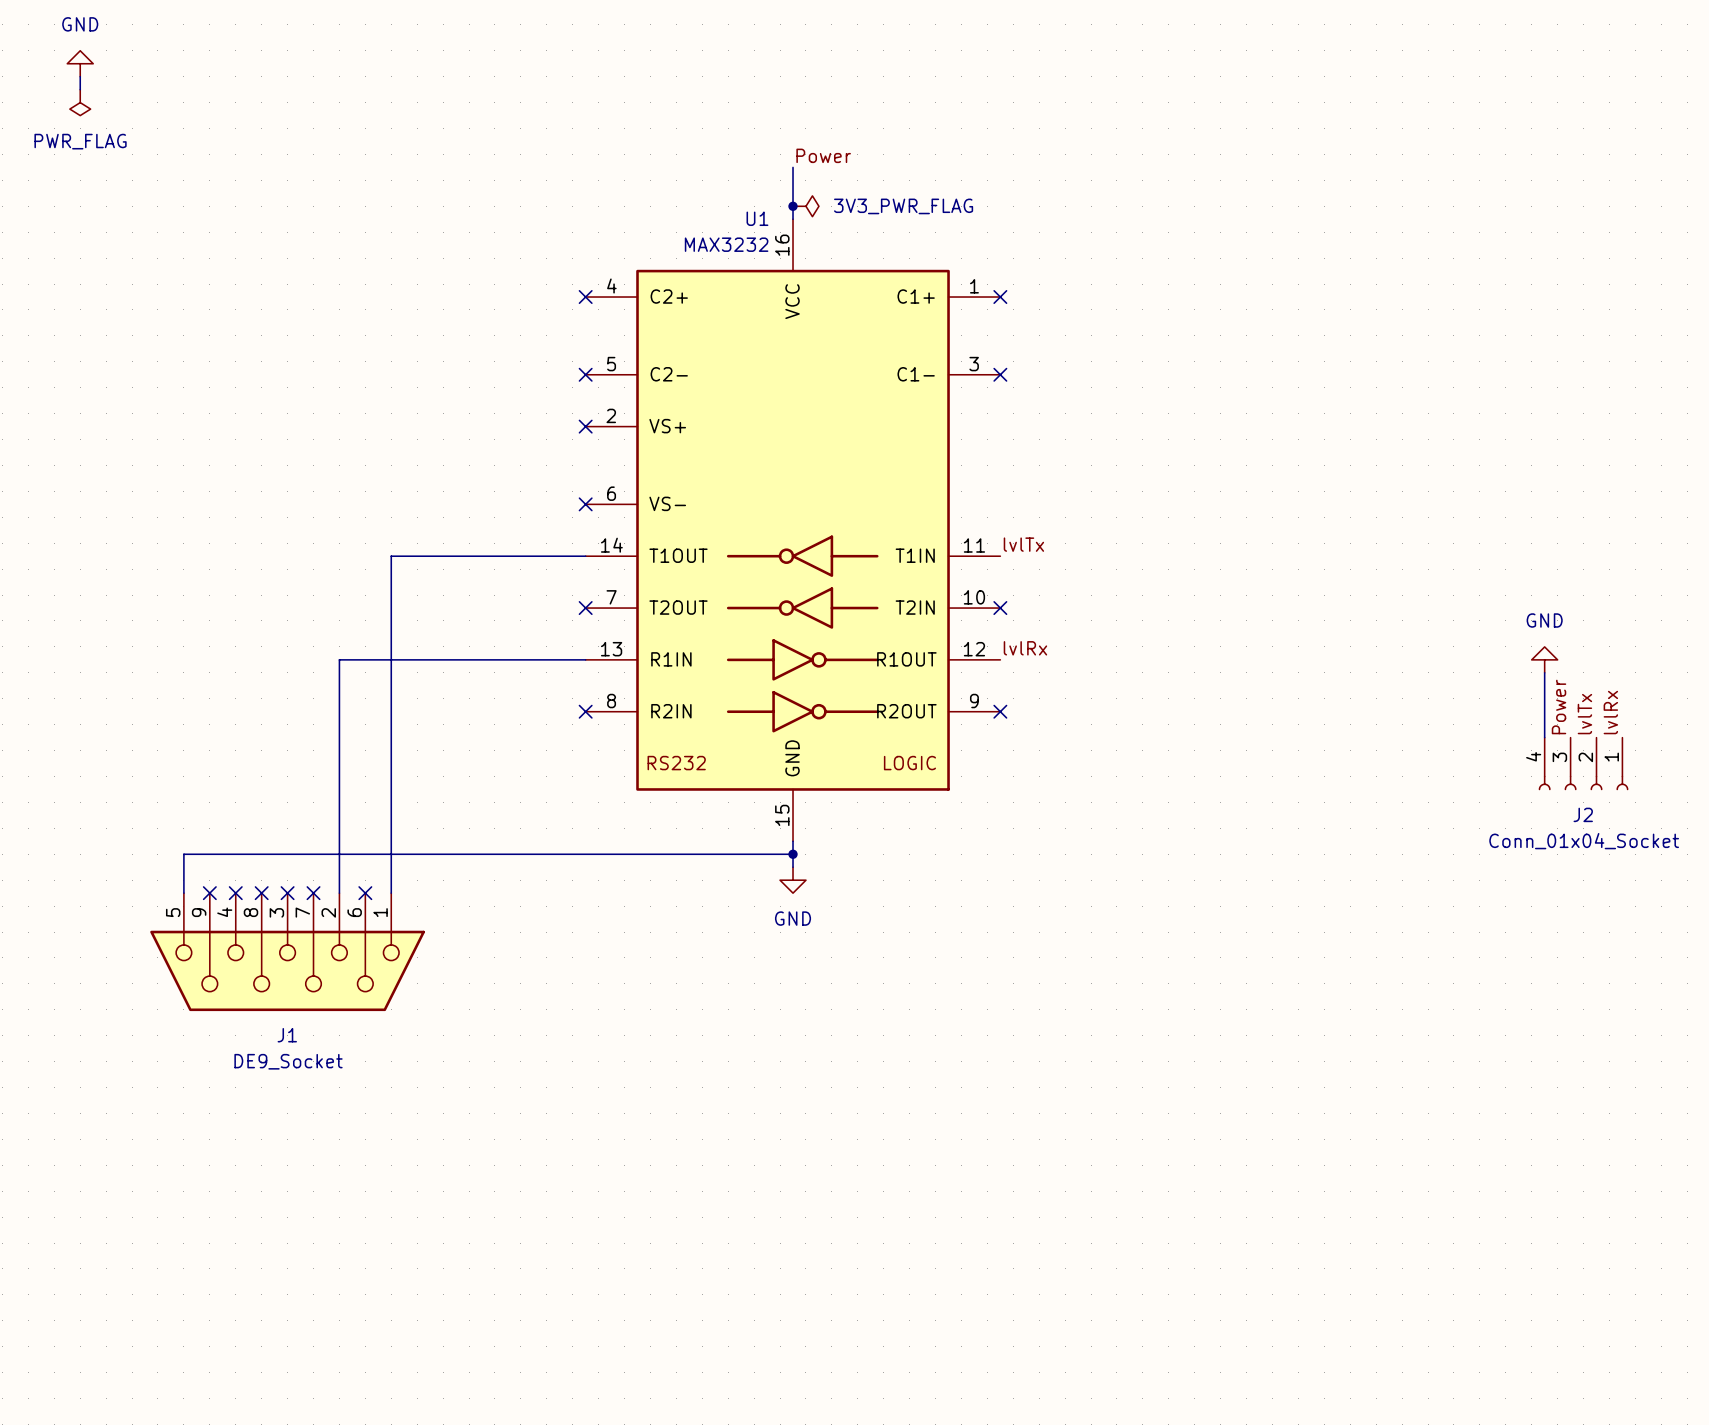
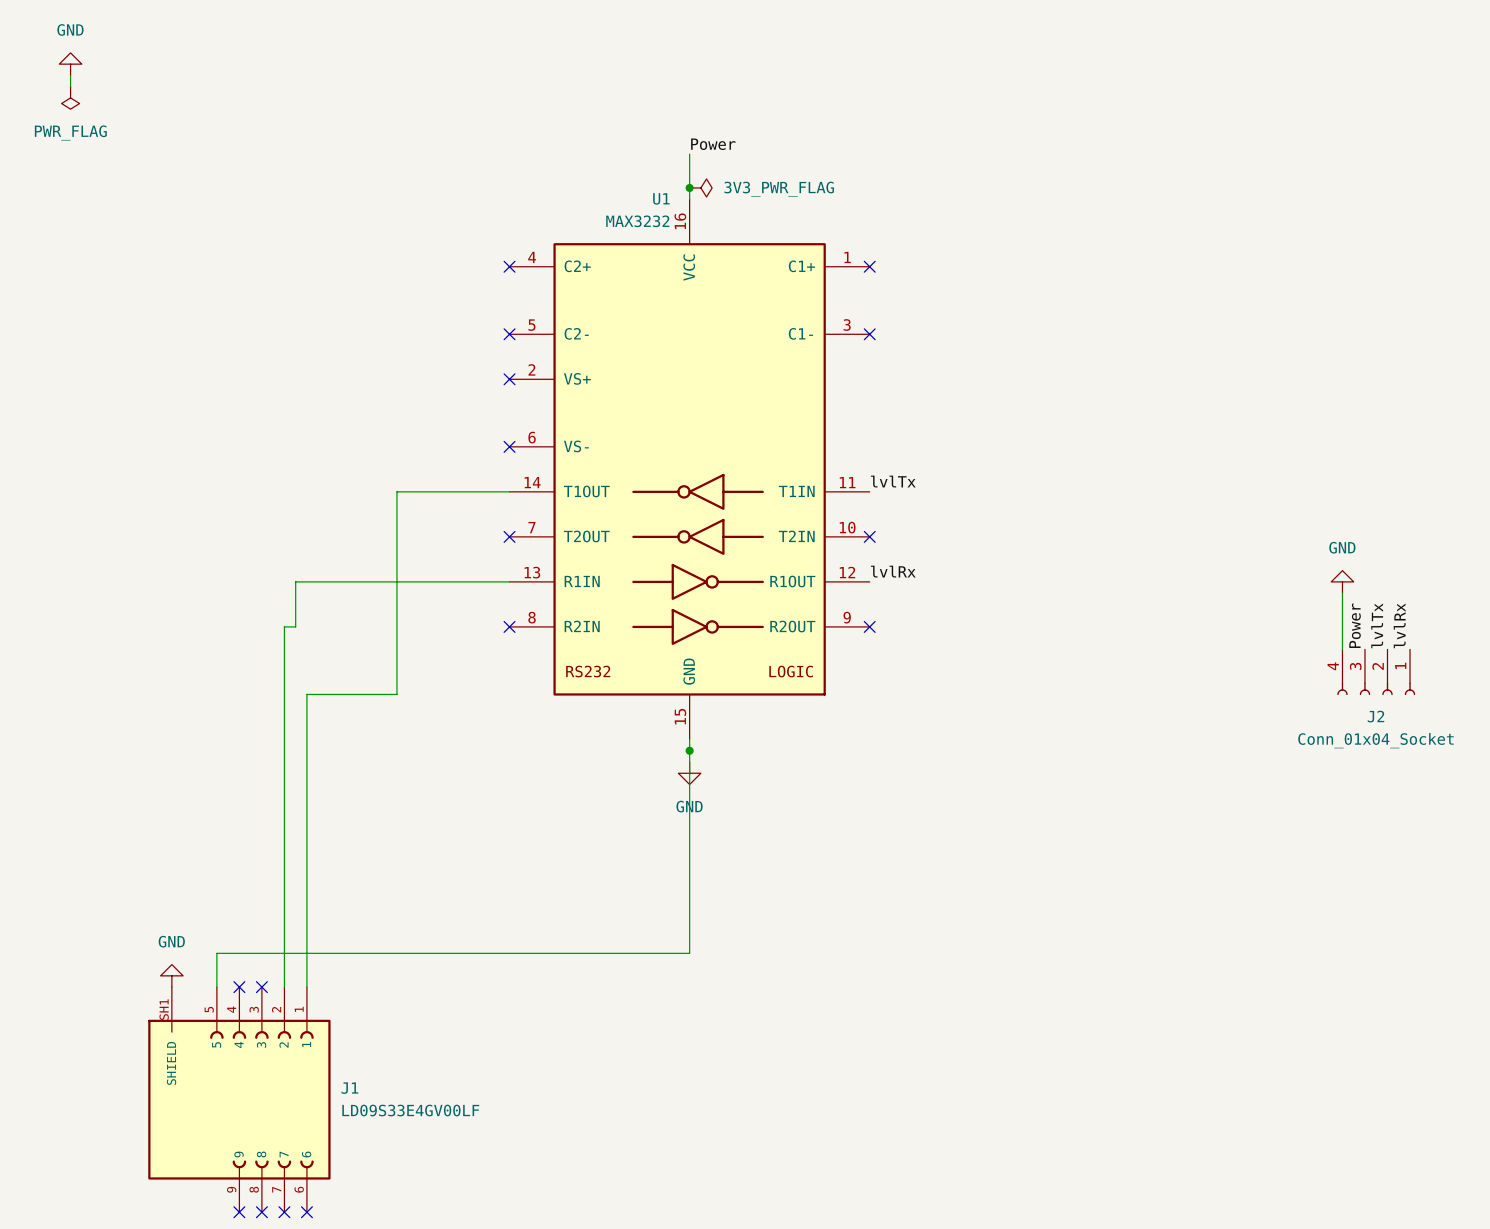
wire: (456, 556) (391, 556) (391, 893) -> (396, 491) (396, 694) (306, 694) (306, 987)
wire: (339, 711) (339, 893) -> (295, 626) (284, 626) (284, 987)
wire: (793, 854) (183, 854) (183, 893) -> none
wire: none -> (689, 762) (689, 953) (216, 953) (216, 987)
J1 symbol: [150, 893, 425, 1012] -> [148, 987, 331, 1213]
no-connect mark: (209, 893) -> none
no-connect mark: (235, 893) -> none
no-connect mark: (261, 893) -> none
no-connect mark: (287, 893) -> none
no-connect mark: (313, 893) -> none
no-connect mark: (365, 893) -> none
J1 name position: J1 (287, 1035) -> J1 (349, 1088)
J1 value: DE9_Socket (288, 1061) -> LD09S33E4GV00LF (410, 1110)
power symbol: none -> GND (171, 975)
no-connect mark: none -> (239, 987)
no-connect mark: none -> (261, 987)
no-connect mark: none -> (239, 1212)
no-connect mark: none -> (261, 1212)
no-connect mark: none -> (284, 1212)
no-connect mark: none -> (306, 1212)

